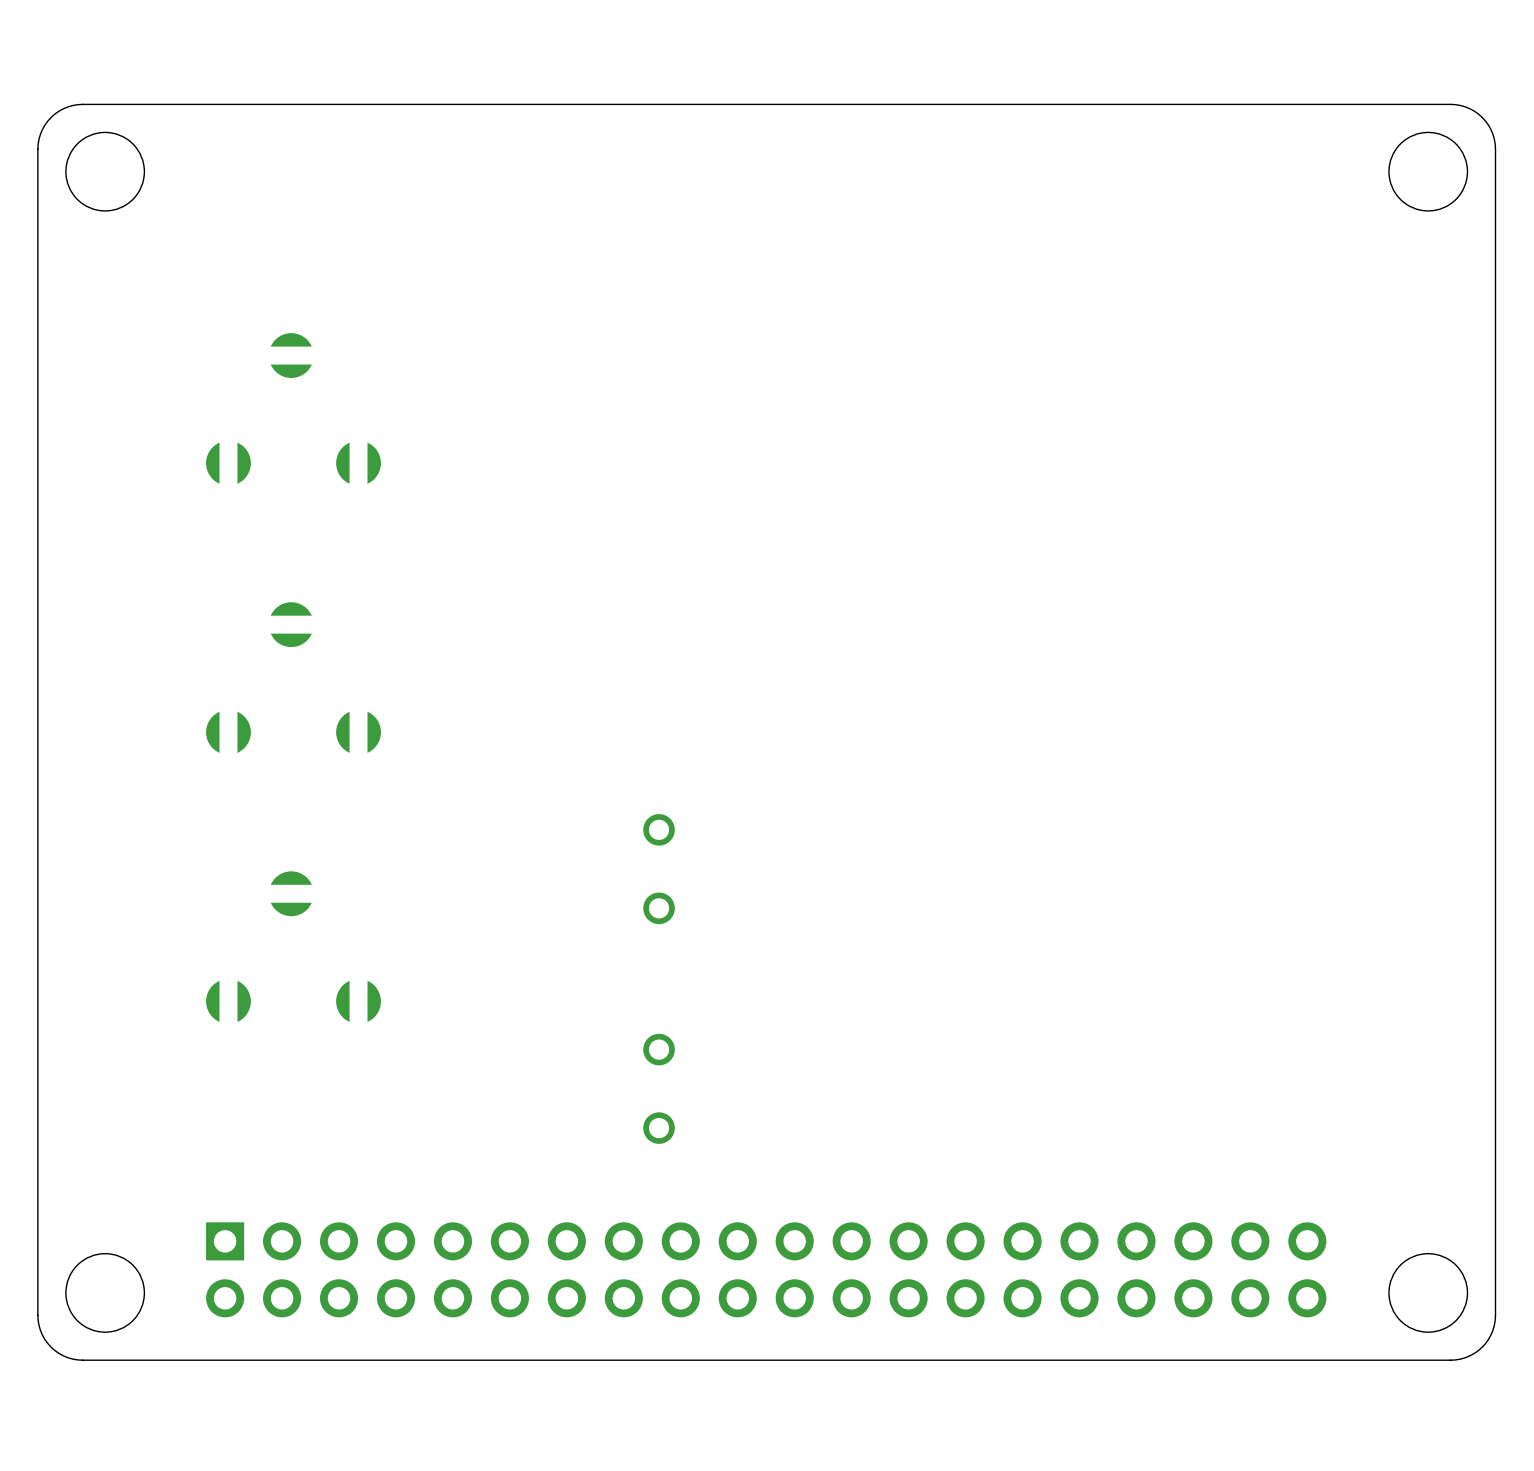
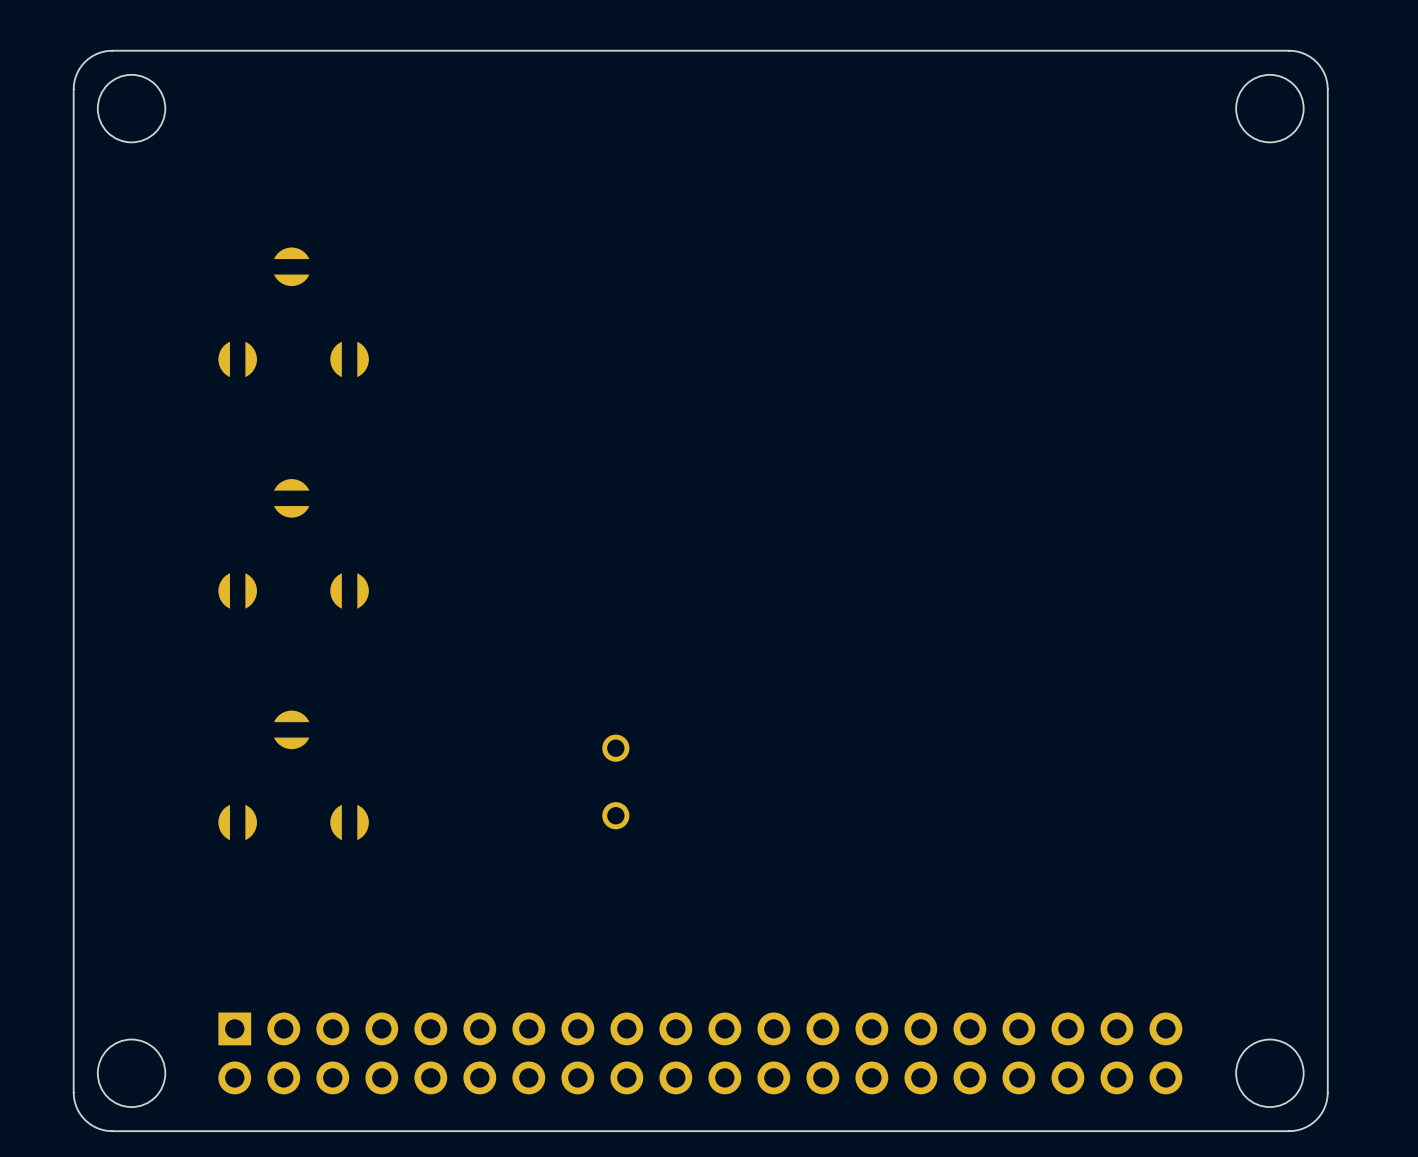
part: (659, 869) -> none
part: none -> (615, 781)
part: (659, 1088) -> none

